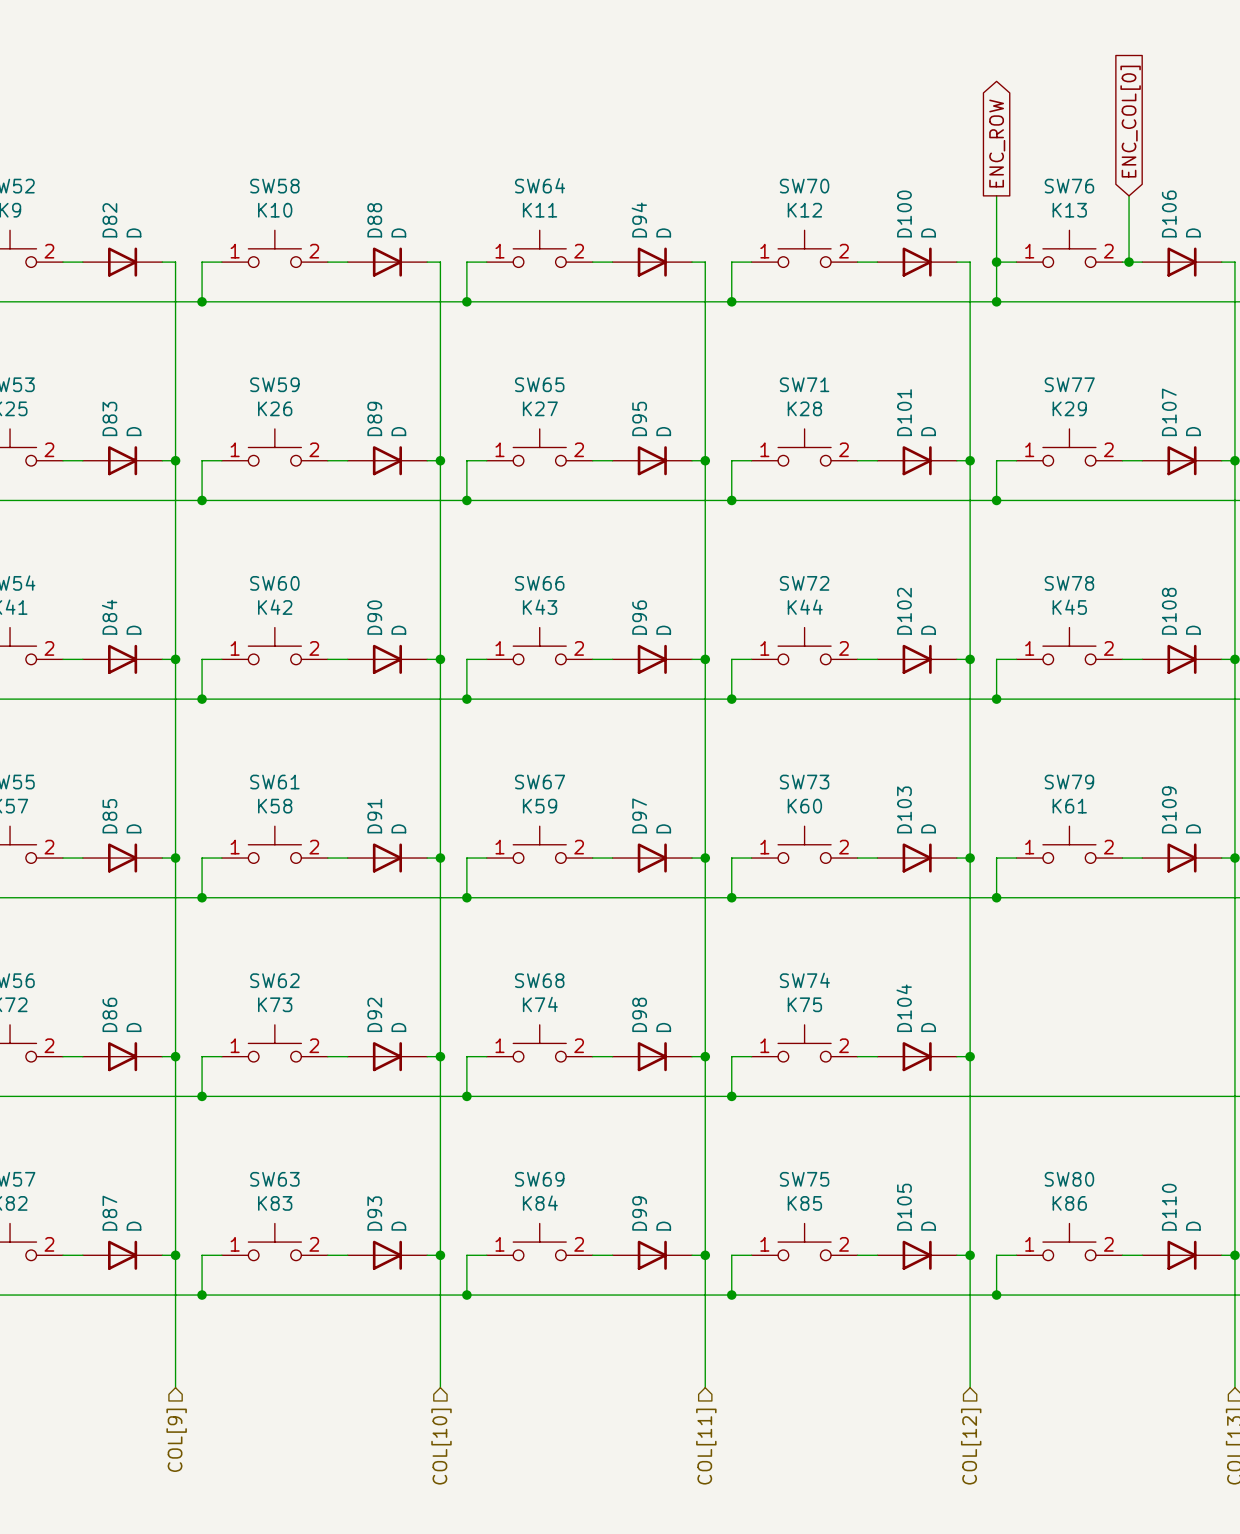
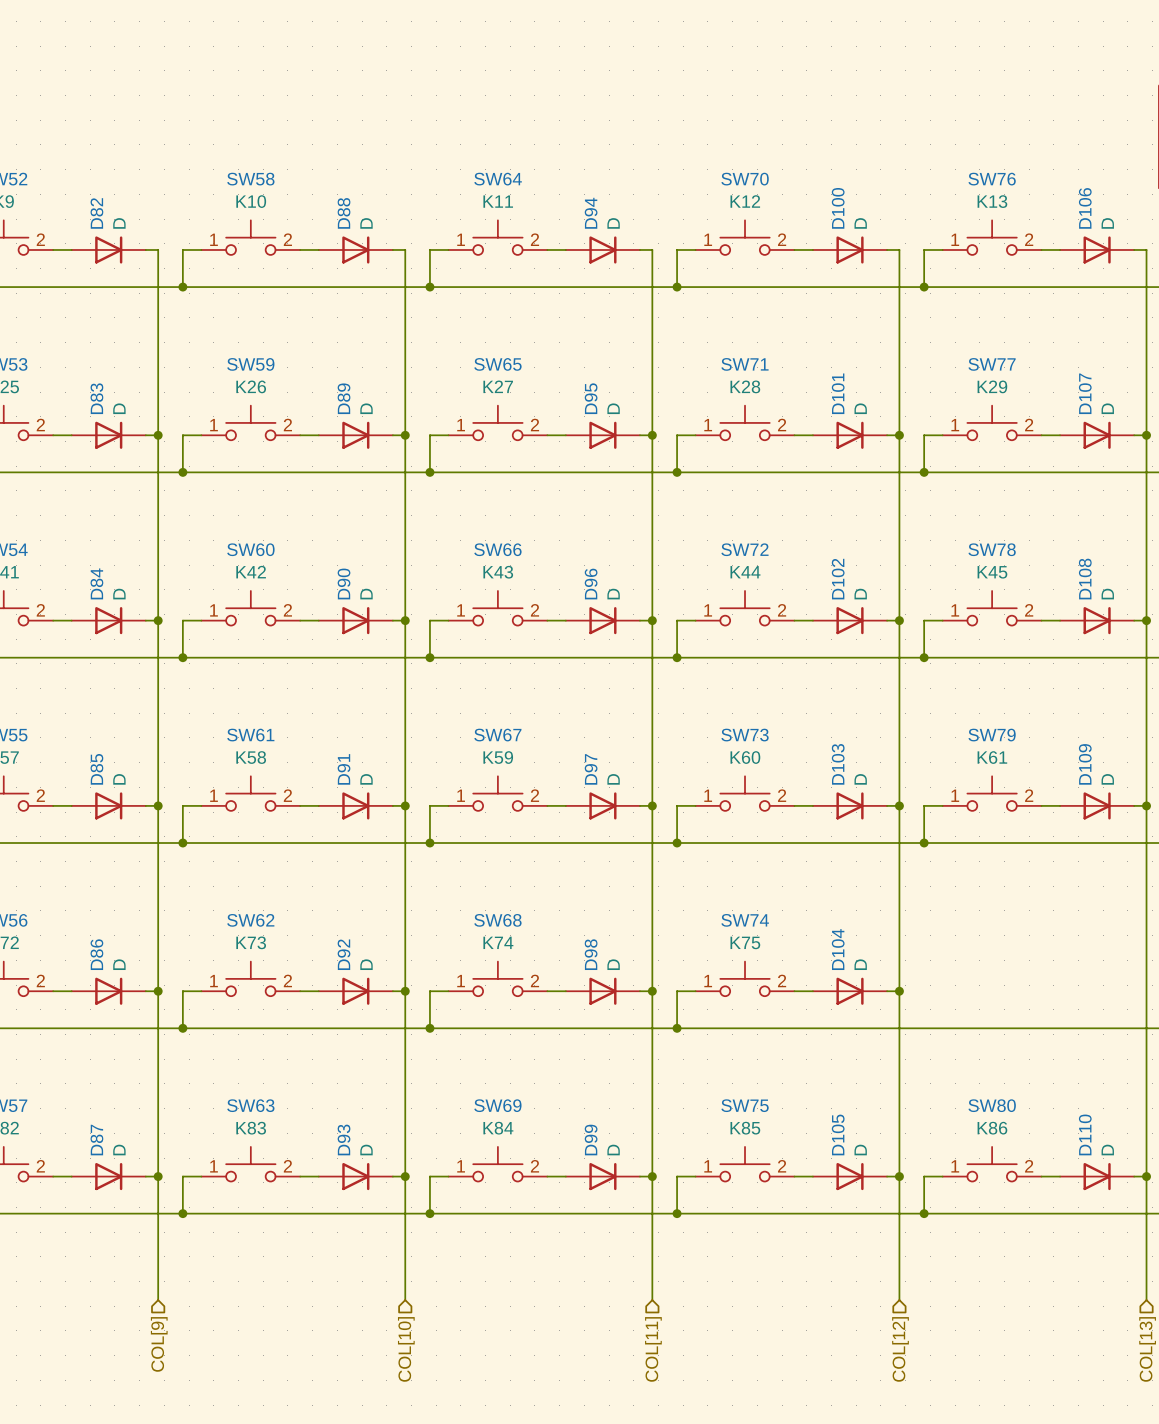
global label: ENC_COL[0] (1130, 121) -> none
global label: ENC_ROW (997, 143) -> none
wire: (996, 195) (996, 262) -> none
wire: (1129, 195) (1129, 262) -> none
junction: (996, 262) -> none
junction: (1129, 262) -> none

